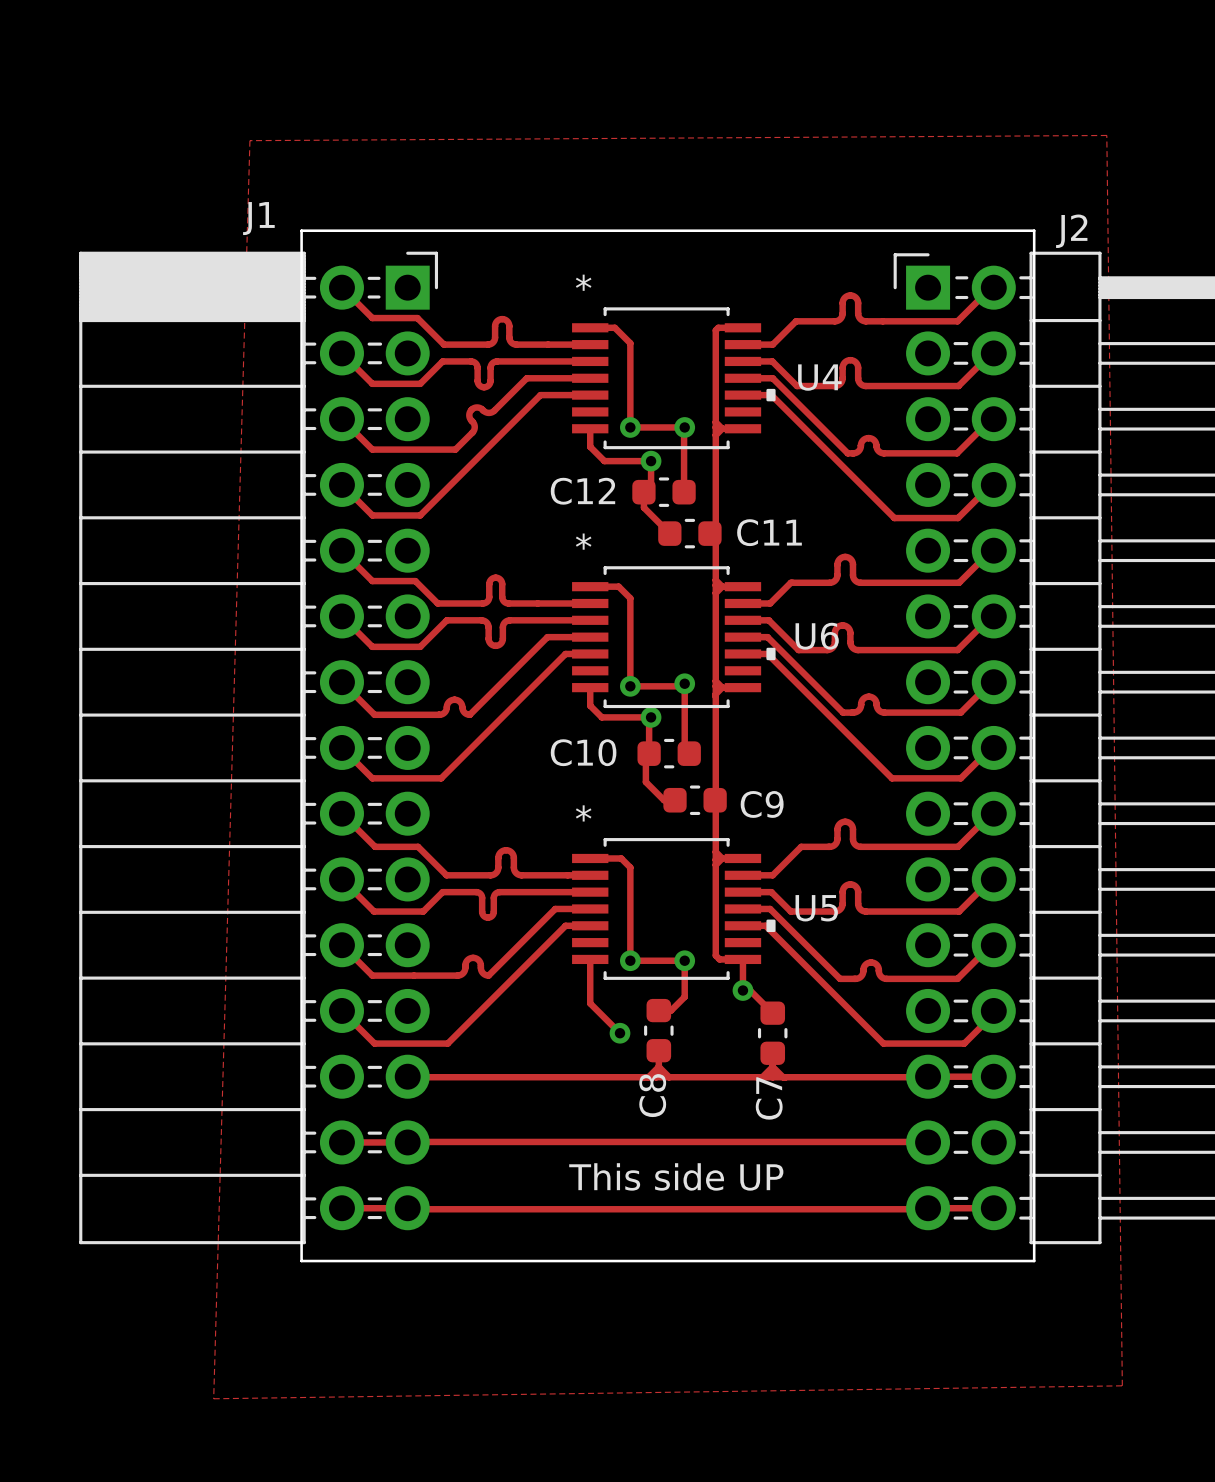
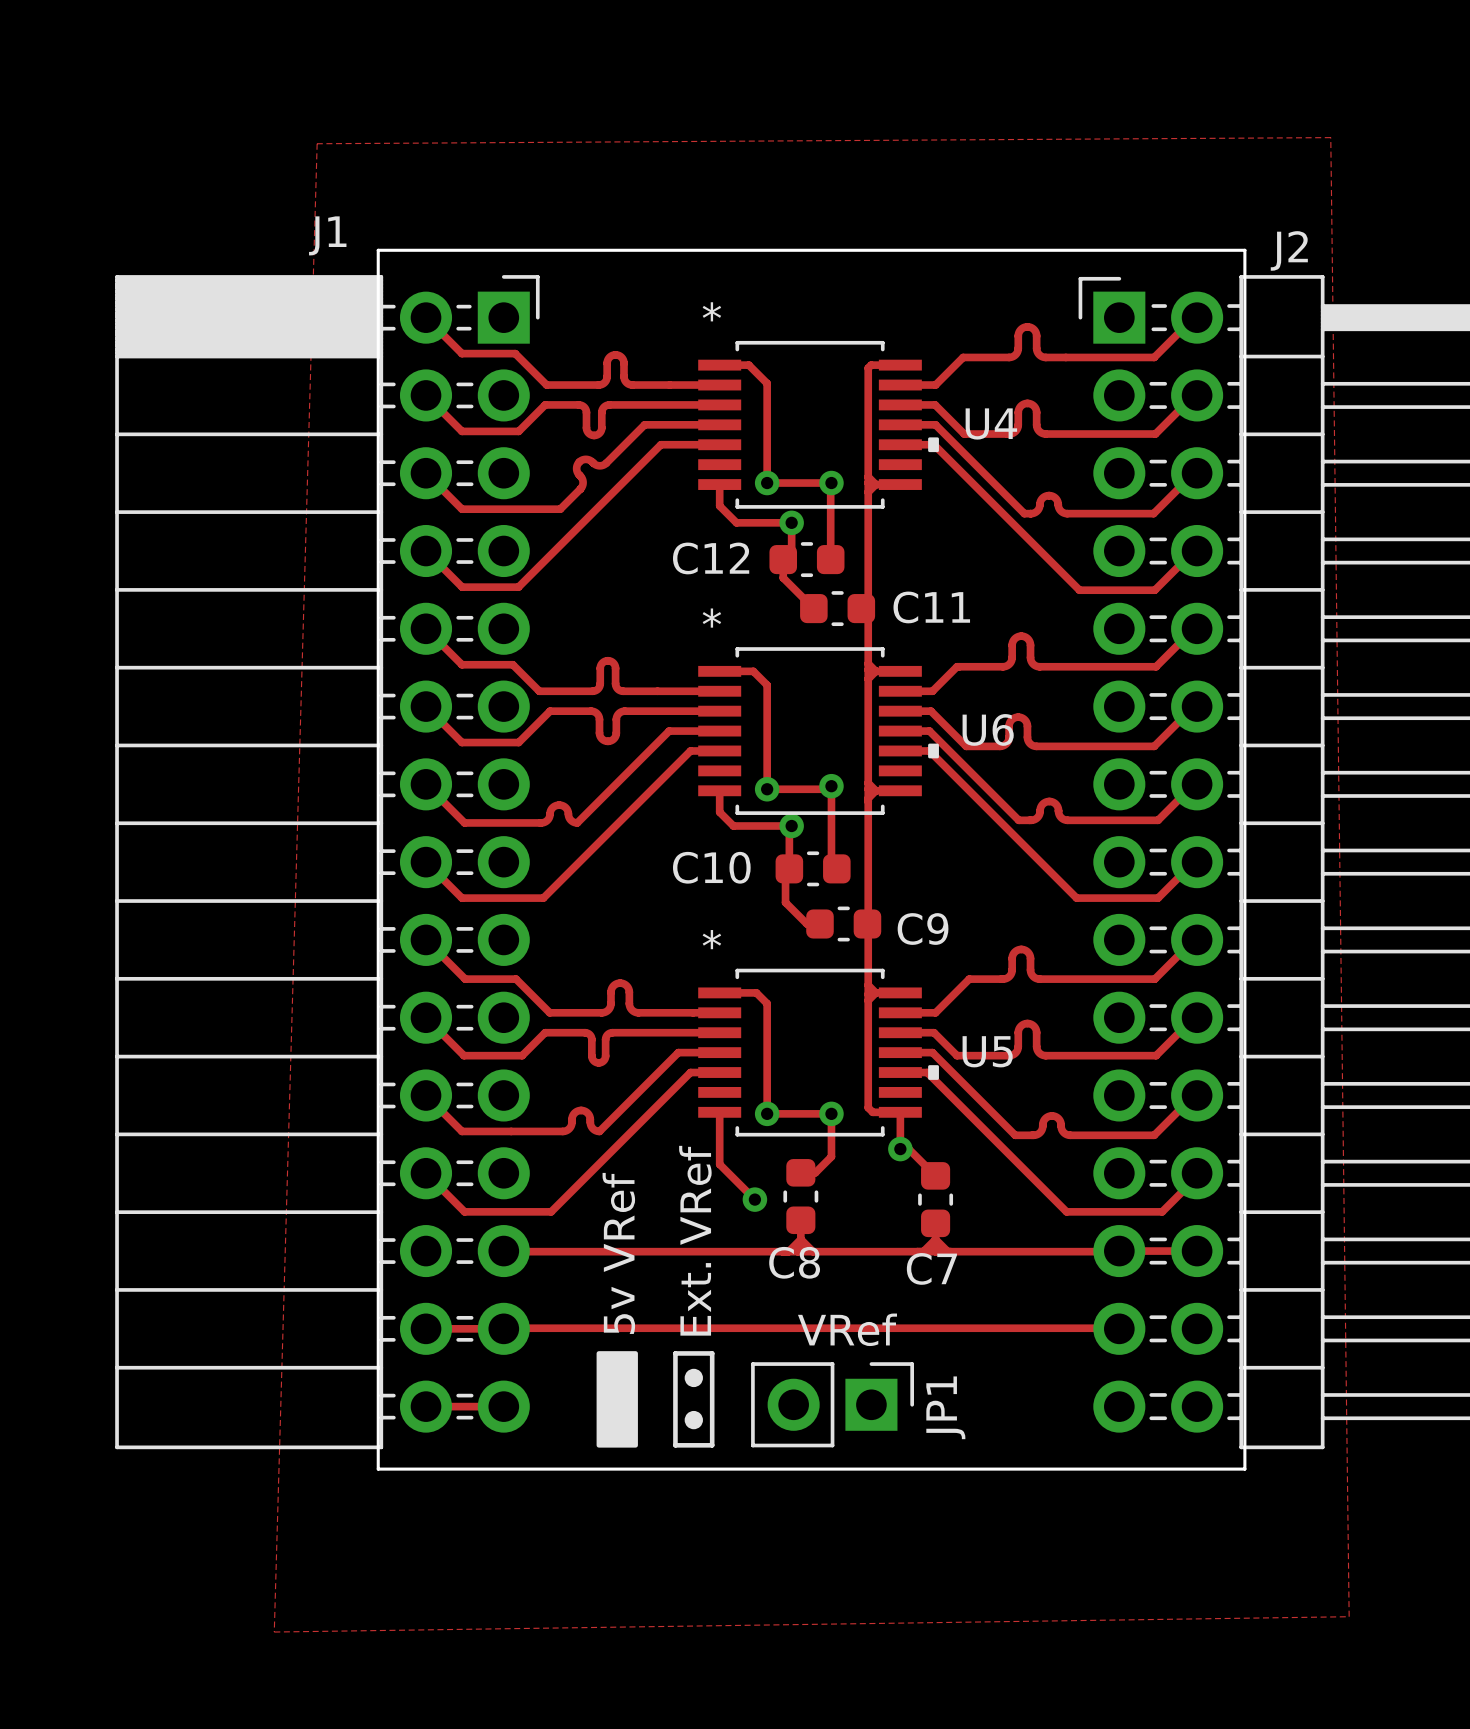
text: none -> Ext. VRef (695, 1240)
text: none -> 5v VRef (618, 1253)
C8 name rotation: 0° (652, 1095) -> 90° clockwise (794, 1262)
C7 name rotation: 0° (769, 1098) -> 90° clockwise (931, 1268)
text: none -> VRef (847, 1329)
drawing: none -> [596, 1351, 638, 1448]
line: none -> (675, 1353) (712, 1353) (712, 1445) (675, 1445) (675, 1353)
drawing: none -> [684, 1368, 703, 1430]
text: This side UP (676, 1176) -> none
JP1: none -> (832, 1404)
track: (407, 1208) (991, 1208) -> none

